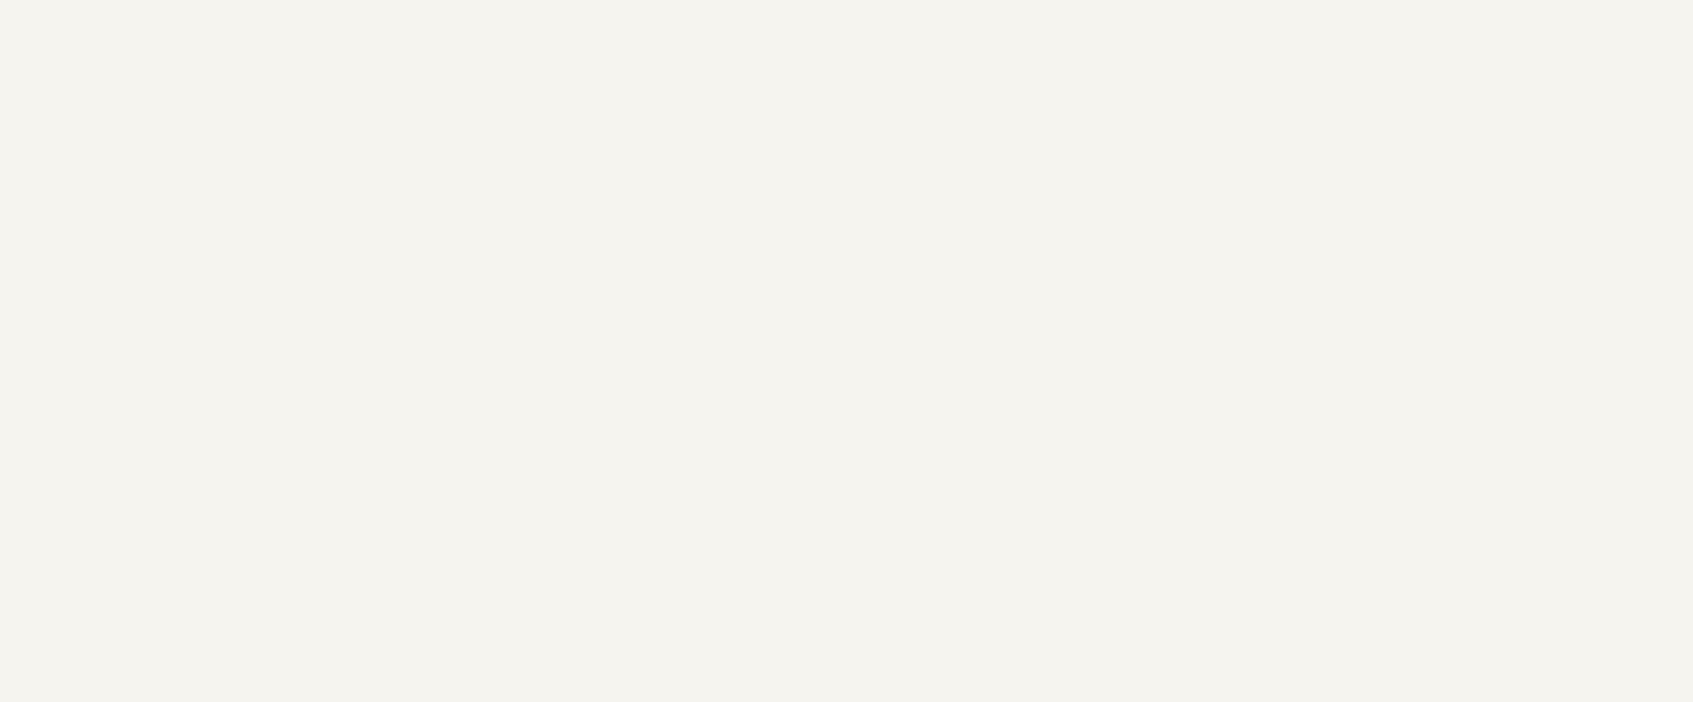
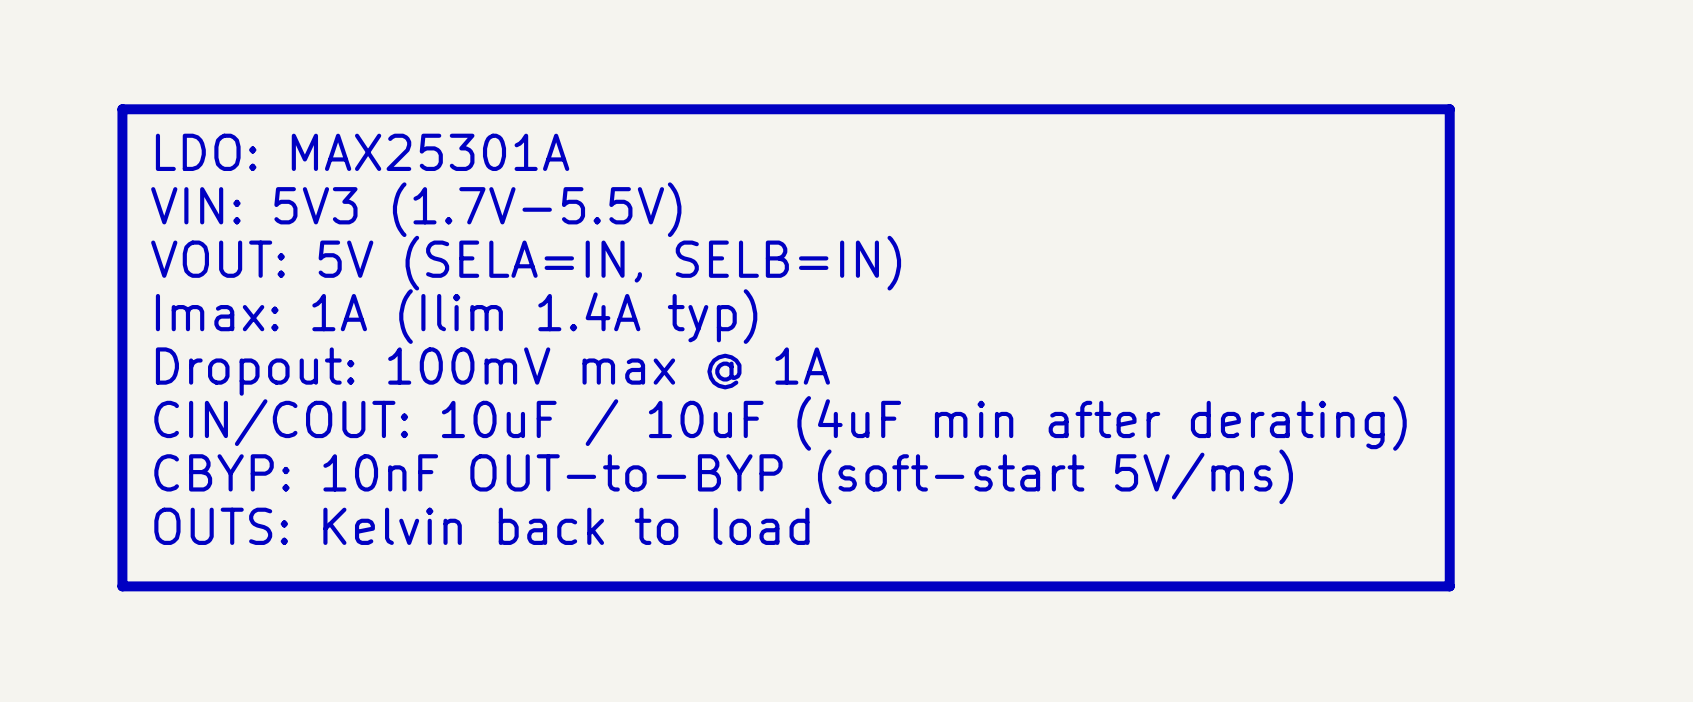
line: none -> (122, 109) (1449, 109) (1449, 586) (122, 586) (122, 109)
text: none -> LDO: MAX25301A (362, 152)
text: none -> VIN: 5V3 (1.7V-5.5V) (416, 209)
text: none -> VOUT: 5V (SELA=IN, SELB=IN) (526, 263)
text: none -> Imax: 1A (Ilim 1.4A typ) (456, 316)
text: none -> Dropout: 100mV max @ 1A (492, 371)
text: none -> CIN/COUT: 10uF / 10uF (4uF min after derating) (780, 423)
text: none -> CBYP: 10nF OUT-to-BYP (soft-start 5V/ms) (723, 476)
text: none -> OUTS: Kelvin back to load (481, 526)

